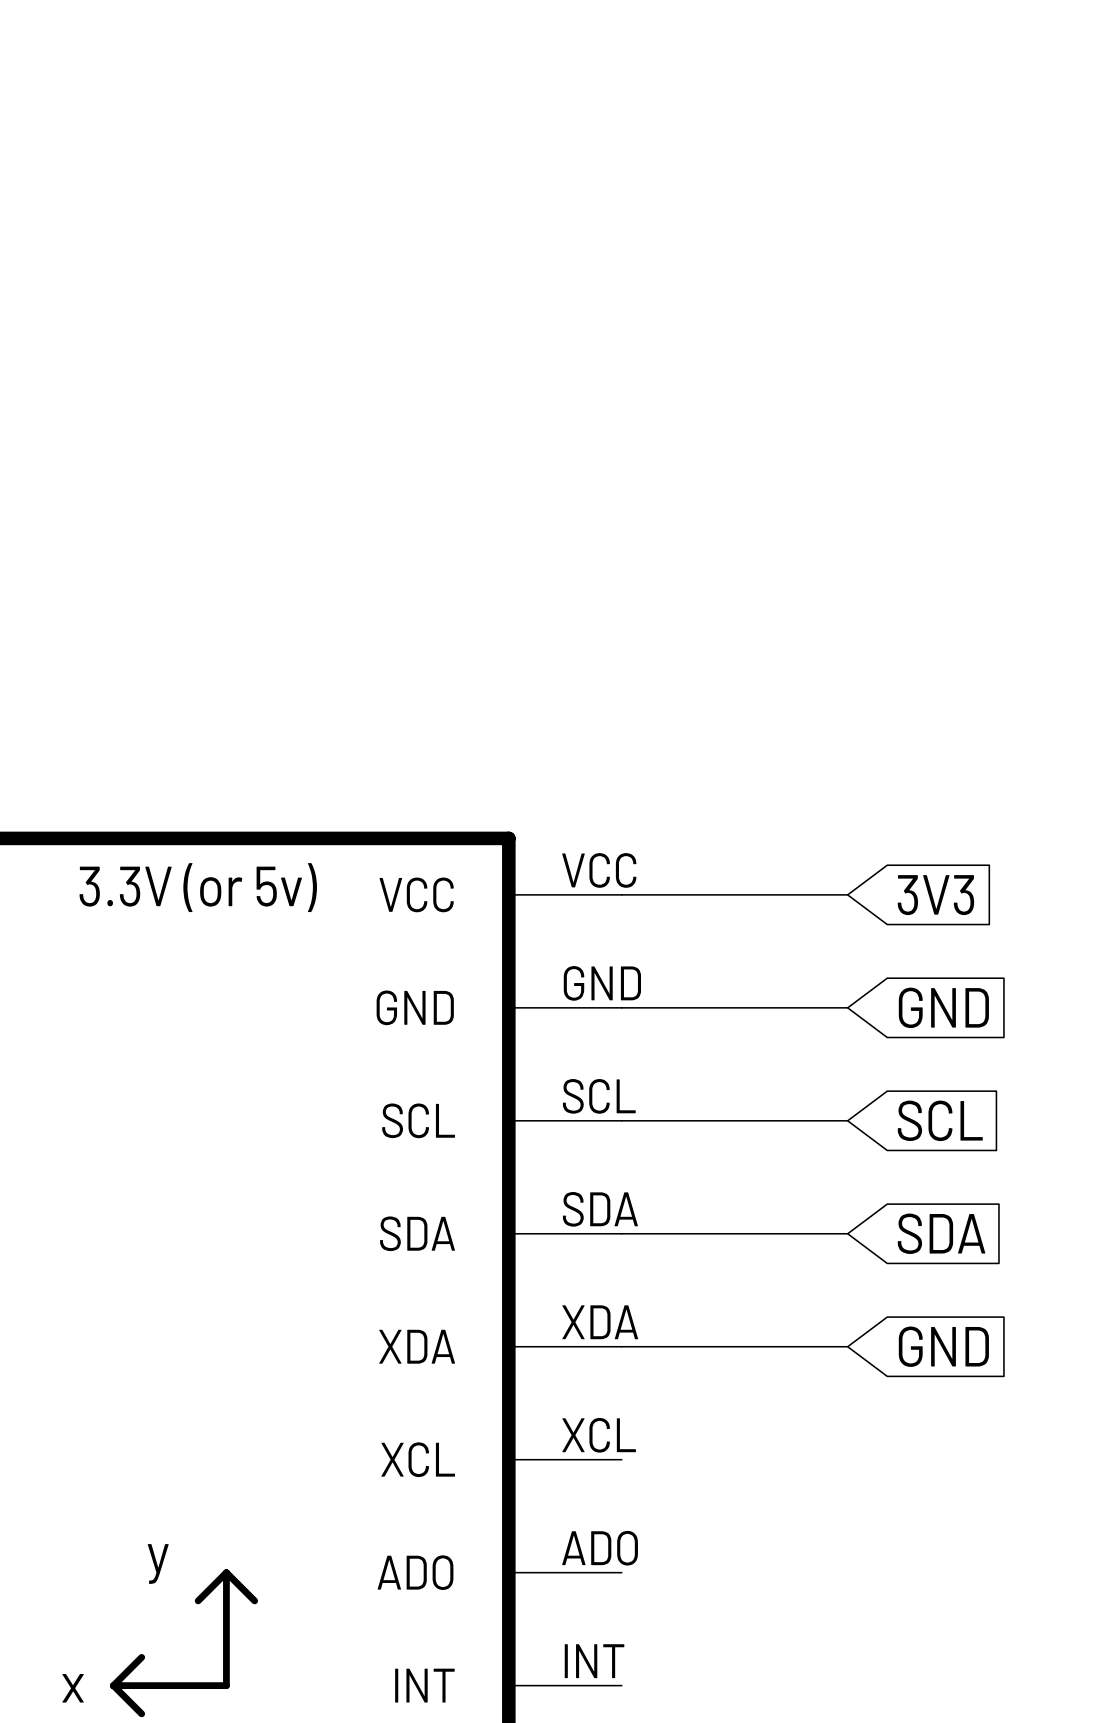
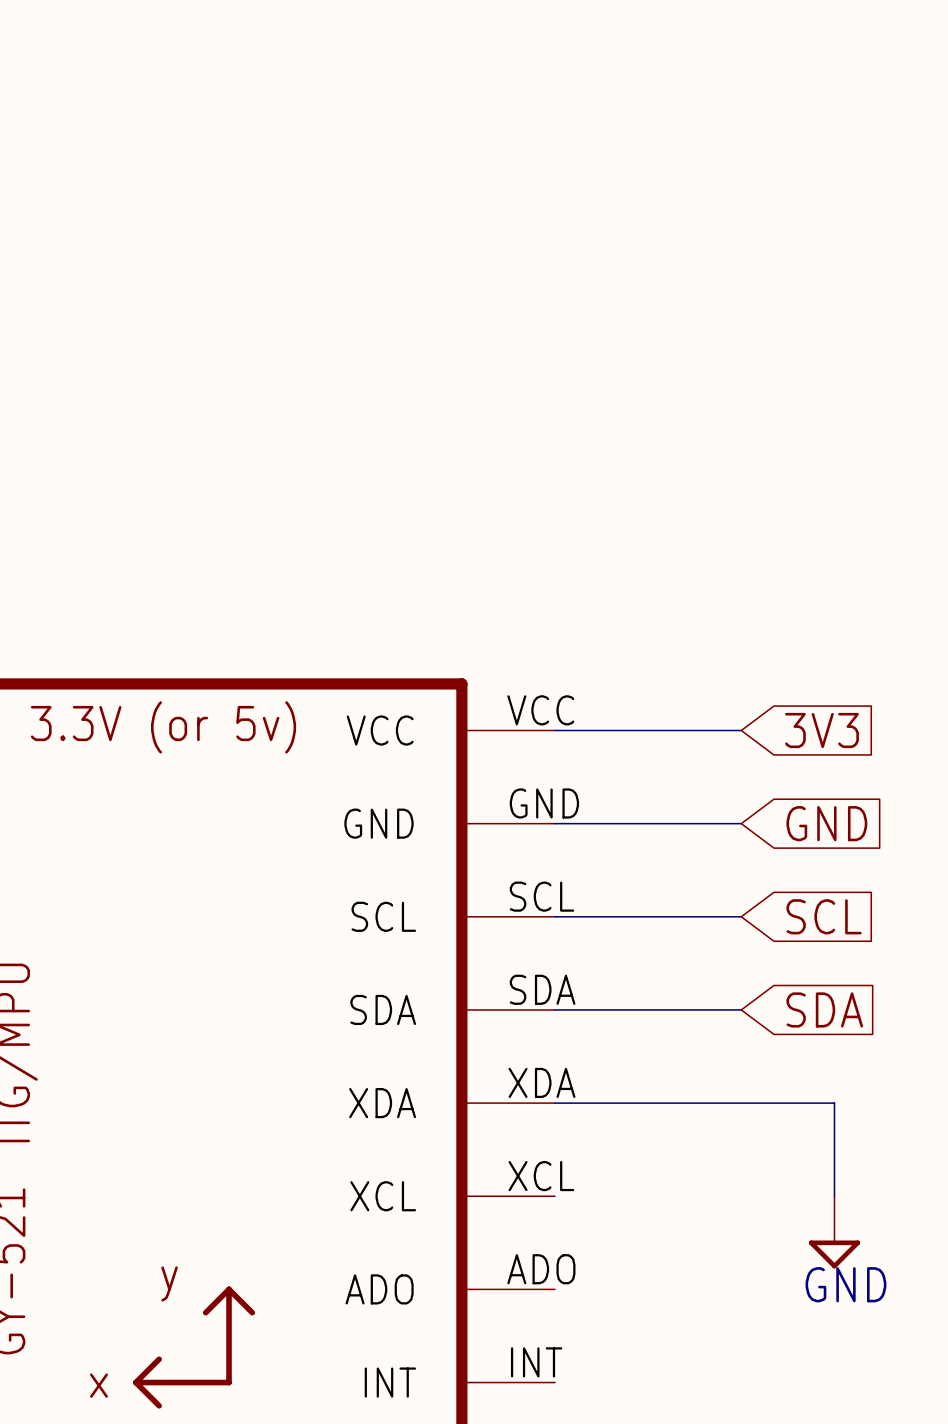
wire: none -> (741, 1103) (834, 1103) (834, 1196)
global label: GND (943, 1346) -> none
power symbol: none -> GND (834, 1232)

